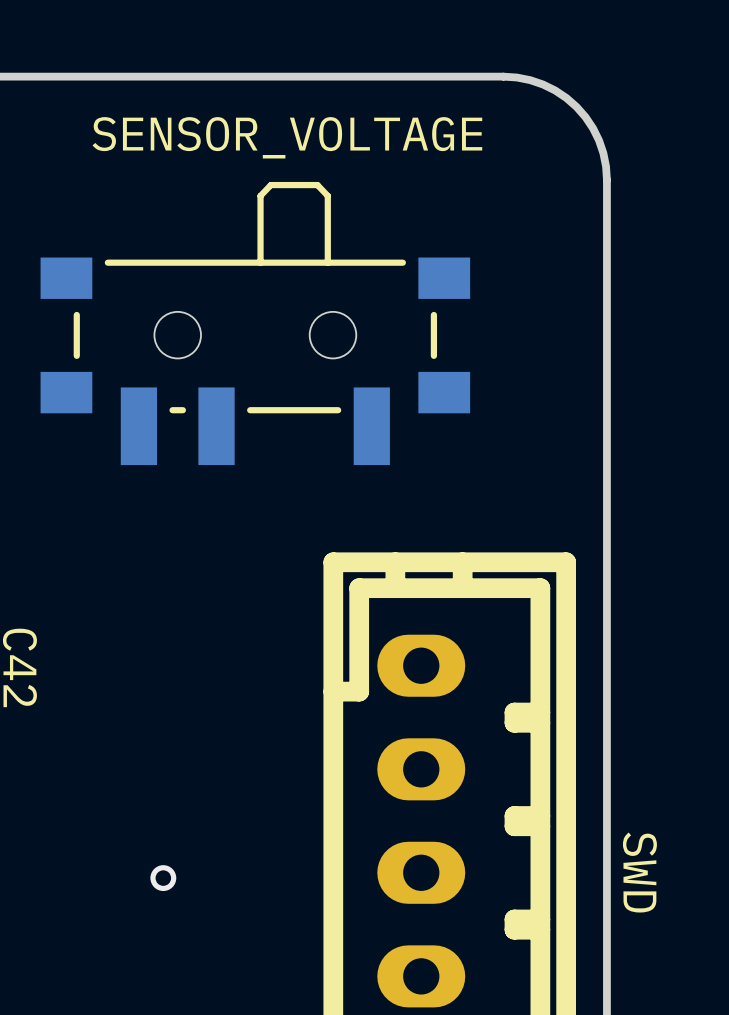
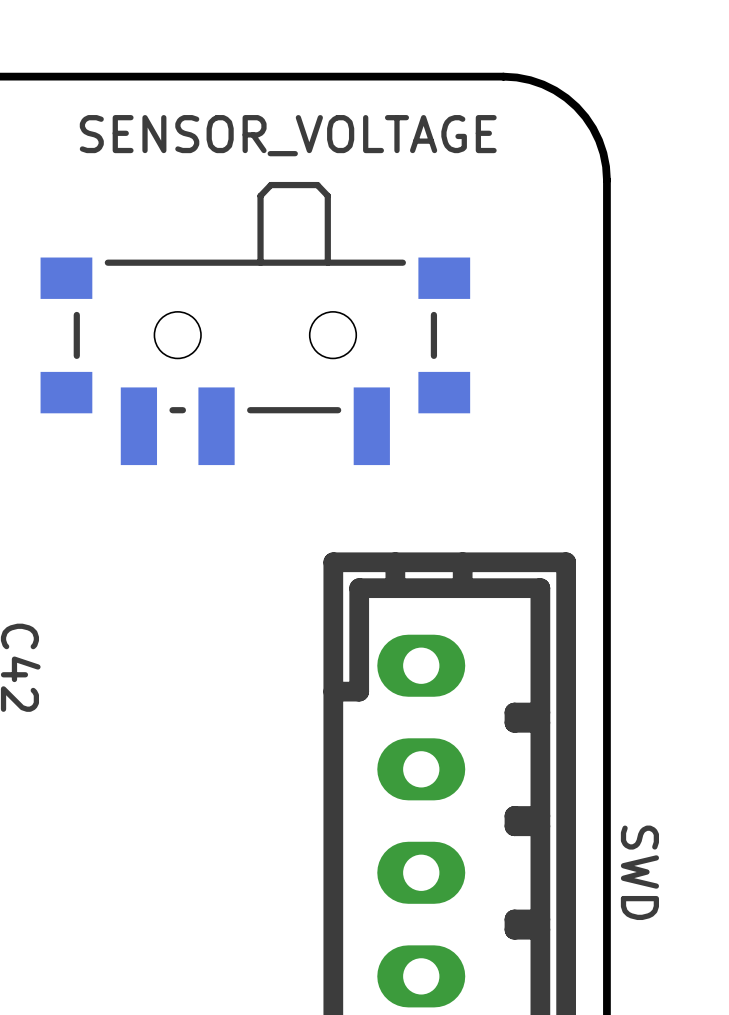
via: (163, 878) -> none

